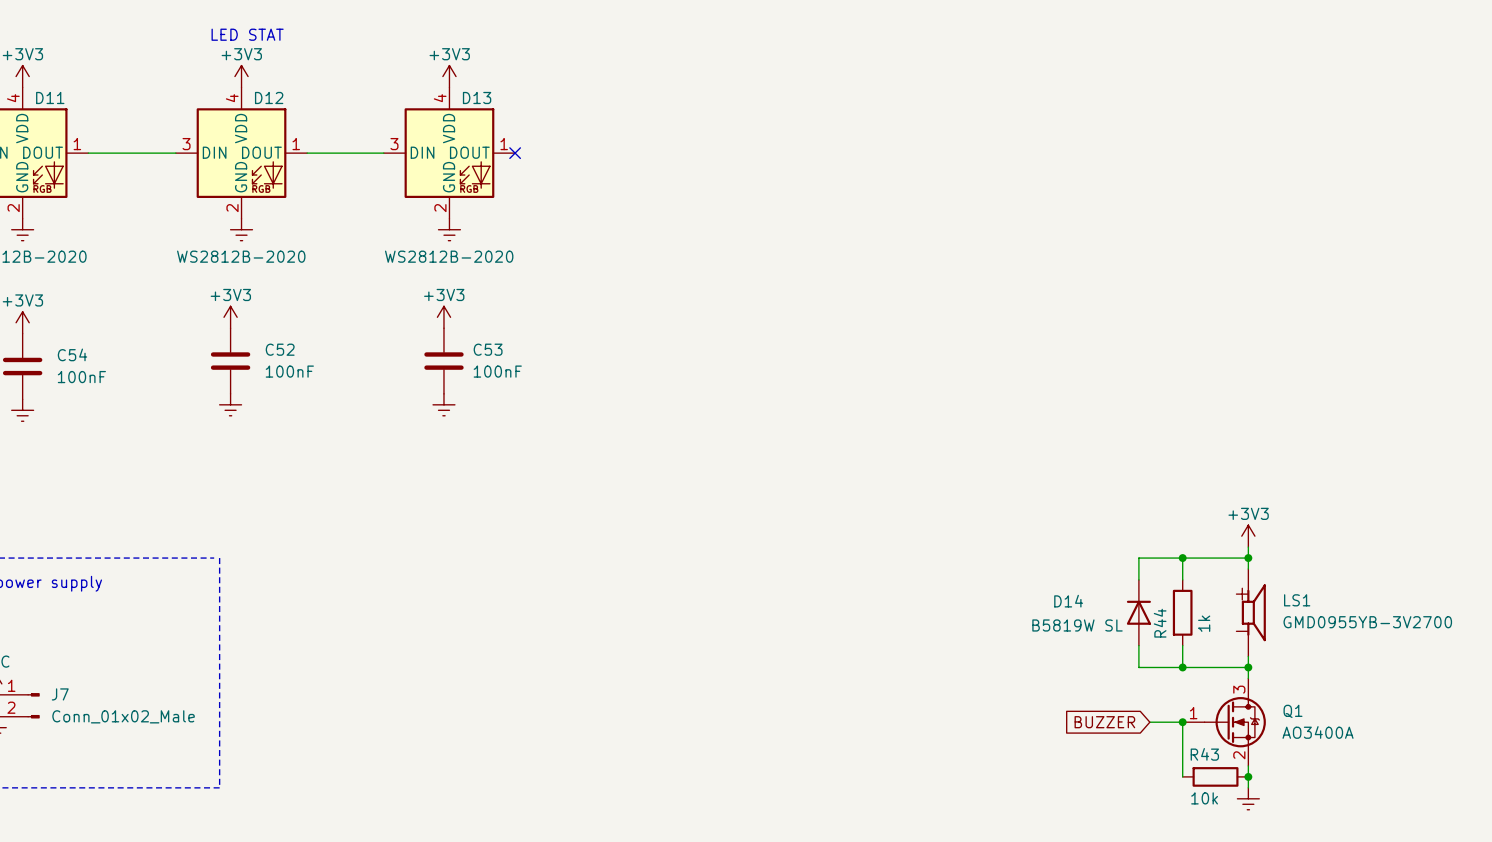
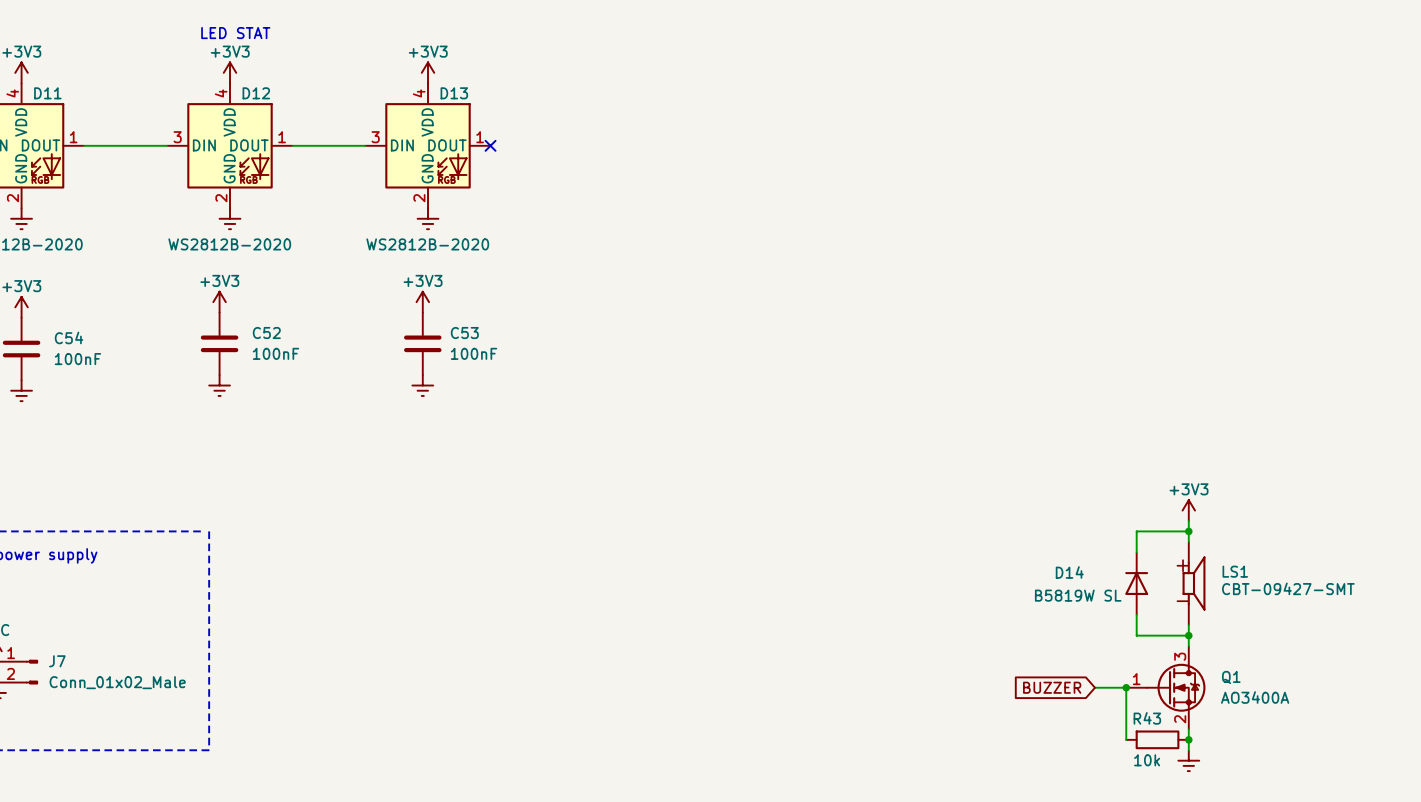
wire: (1182, 558) (1182, 579) -> none
junction: (1182, 558) -> none
wire: (1193, 558) (1138, 558) (1138, 579) -> (1136, 531) (1136, 552)
D14 position: (1138, 612) -> (1136, 583)
R44: 1k (1182, 612) -> none
LS1 value: GMD0955YB-3V2700 (1367, 622) -> CBT-09427-SMT (1288, 588)
wire: (1138, 645) (1138, 667) (1193, 667) -> (1136, 614) (1136, 635)
wire: (1182, 645) (1182, 667) -> none
junction: (1182, 667) -> none

